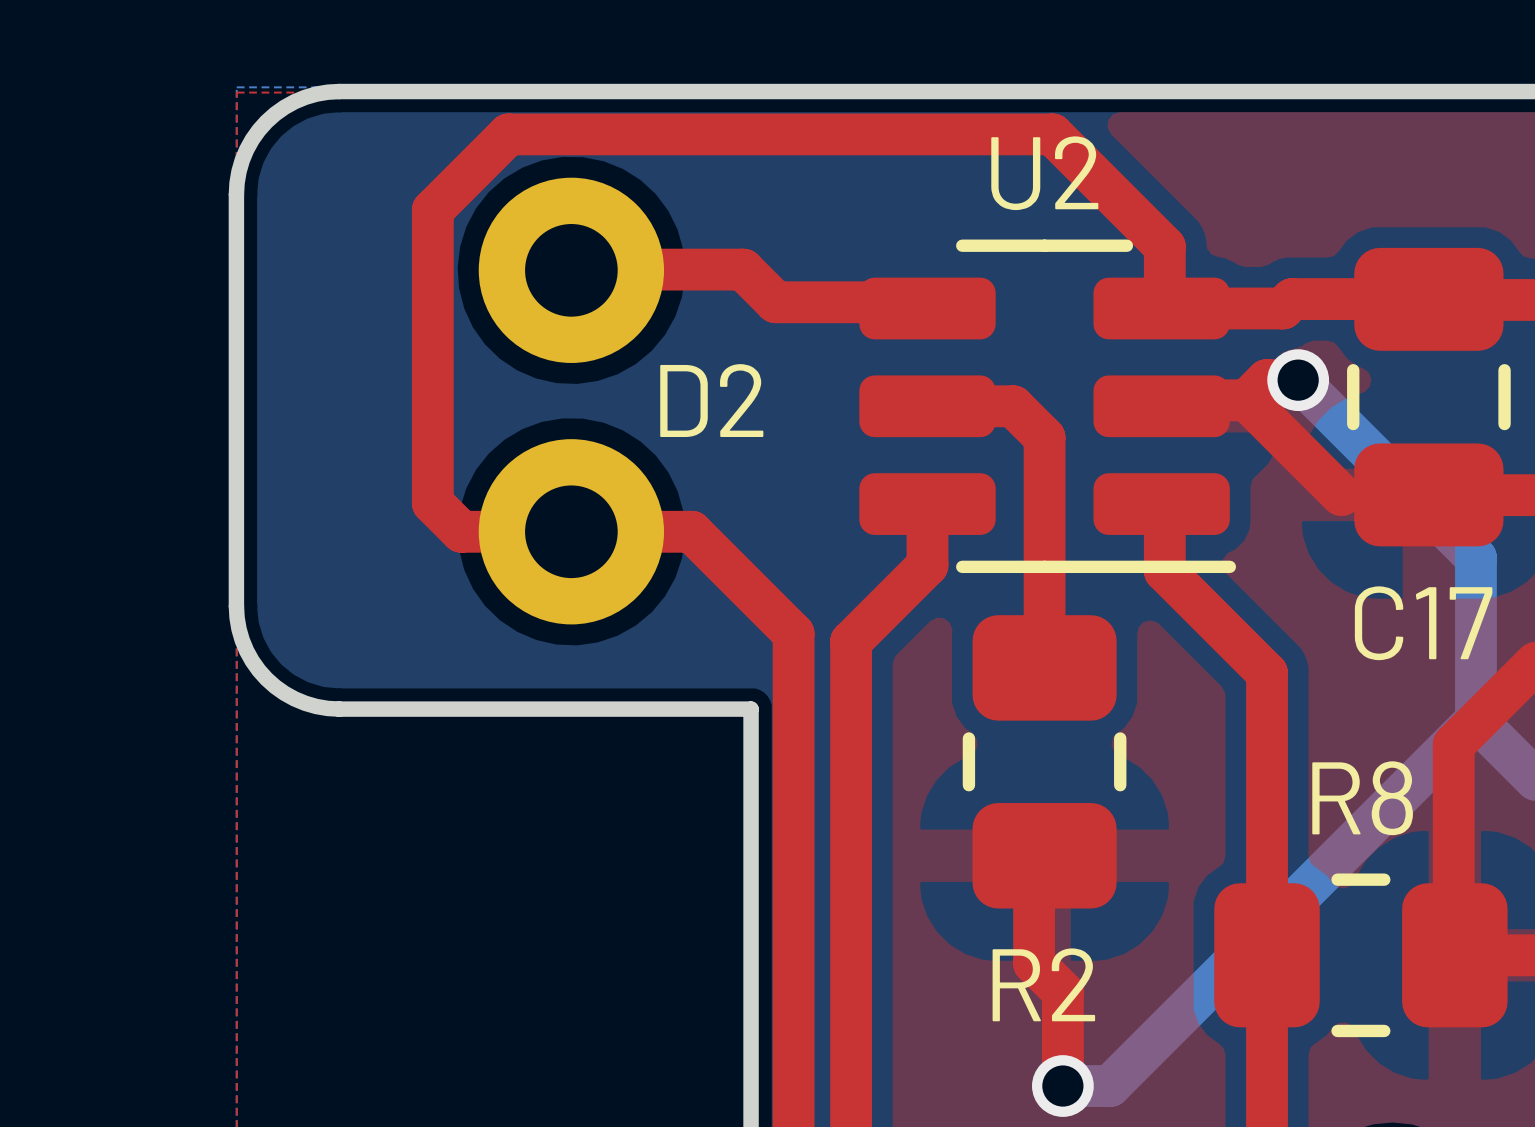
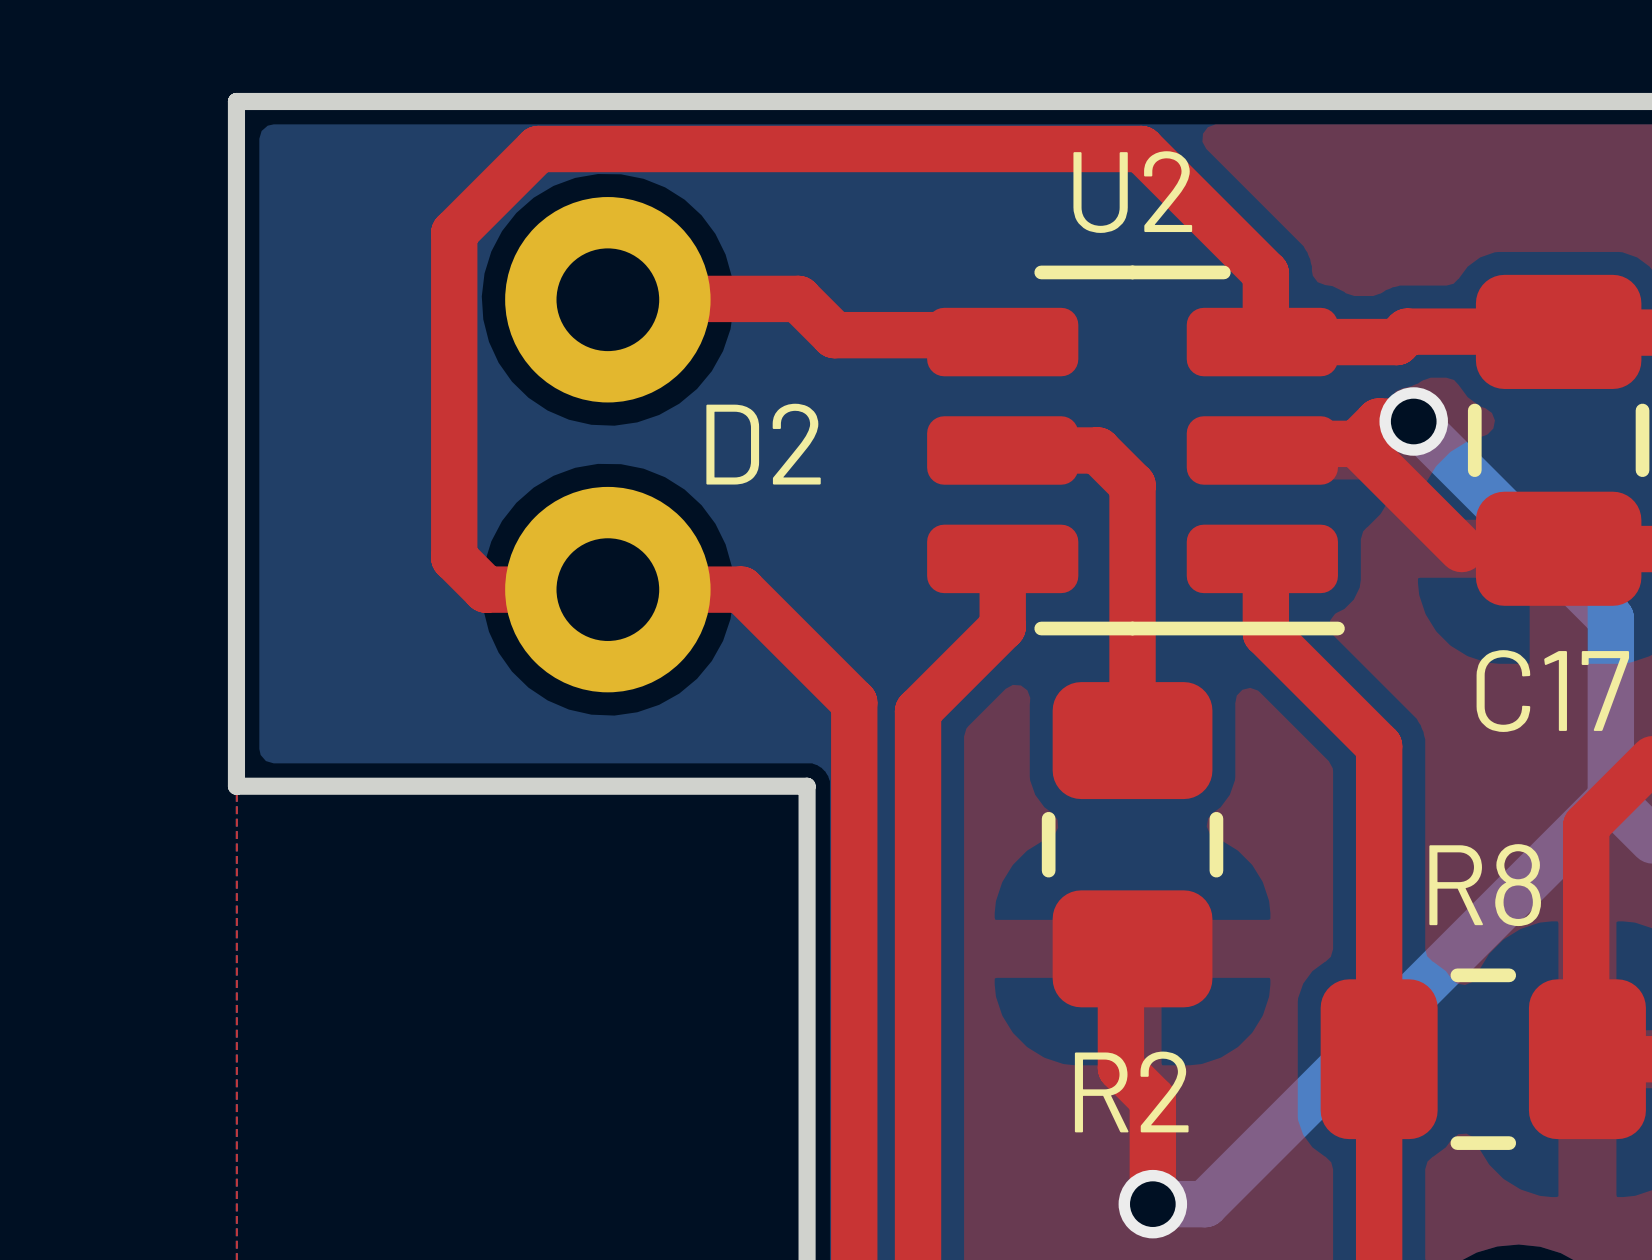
board edge: (339, 91) (316, 94) (294, 101) (266, 121) (246, 149) (238, 171) (236, 194) -> (350, 101) (236, 101) (236, 215)
board edge: (236, 606) (238, 629) (246, 650) (266, 678) (294, 698) (316, 706) (339, 709) -> (236, 672) (236, 786) (350, 786)

